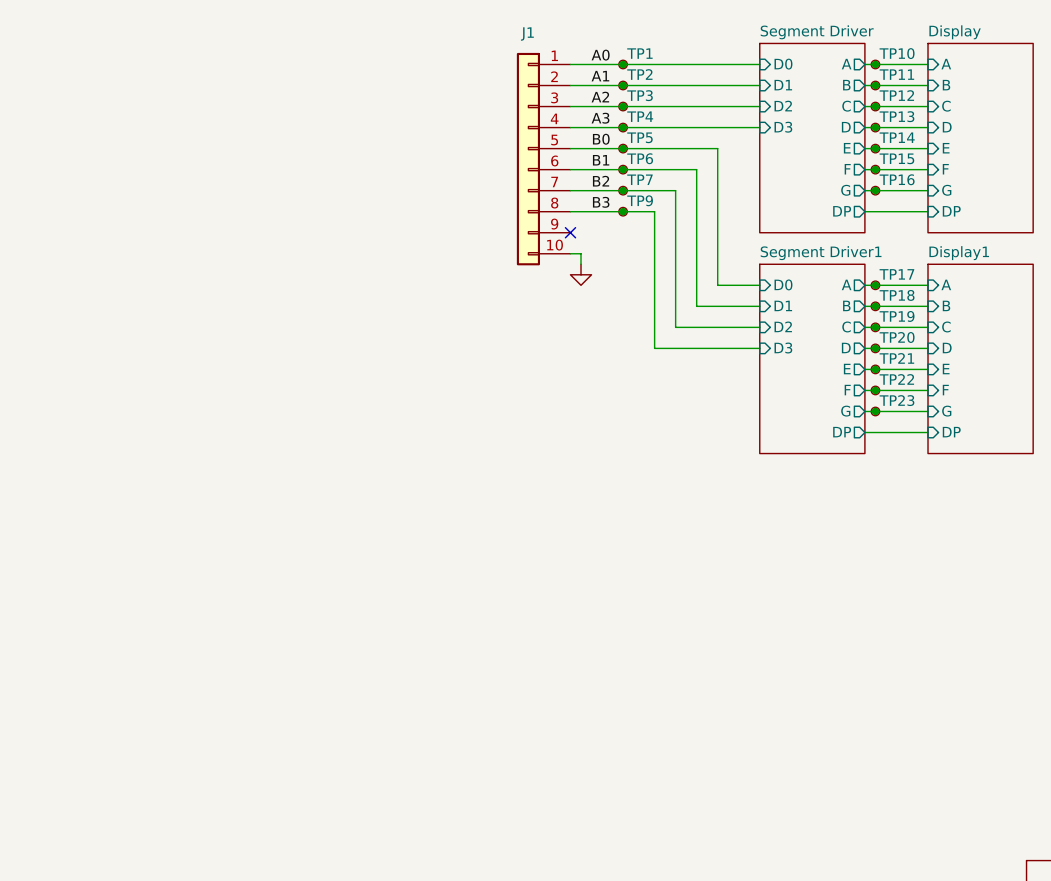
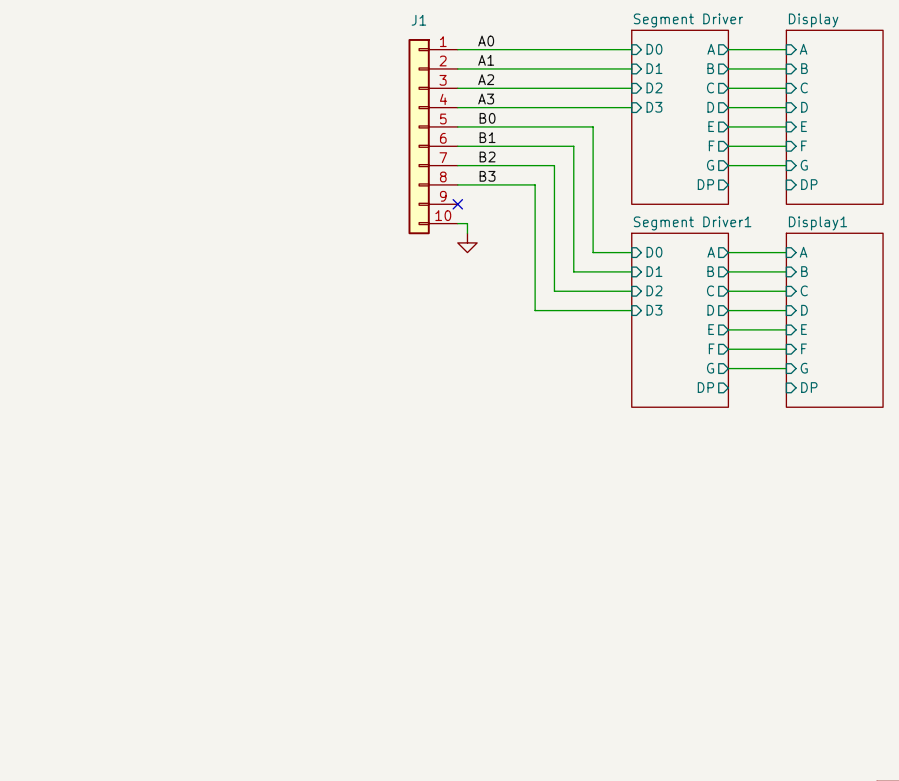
junction: (623, 64) -> none
TP1: (623, 64) -> none
junction: (875, 64) -> none
TP10: (875, 64) -> none
junction: (623, 85) -> none
TP2: (623, 85) -> none
junction: (875, 85) -> none
TP11: (875, 85) -> none
junction: (623, 106) -> none
TP3: (623, 106) -> none
junction: (875, 106) -> none
TP12: (875, 106) -> none
junction: (623, 127) -> none
TP4: (623, 127) -> none
junction: (875, 127) -> none
TP13: (875, 127) -> none
junction: (623, 148) -> none
TP5: (623, 148) -> none
junction: (875, 148) -> none
TP14: (875, 148) -> none
junction: (623, 169) -> none
TP6: (623, 169) -> none
junction: (875, 169) -> none
TP15: (875, 169) -> none
junction: (623, 190) -> none
TP7: (623, 190) -> none
junction: (875, 190) -> none
TP16: (875, 190) -> none
junction: (623, 211) -> none
TP9: (623, 211) -> none
wire: (864, 211) (928, 211) -> none
junction: (875, 285) -> none
TP17: (875, 285) -> none
junction: (875, 306) -> none
TP18: (875, 306) -> none
junction: (875, 327) -> none
TP19: (875, 327) -> none
junction: (875, 348) -> none
TP20: (875, 348) -> none
junction: (875, 369) -> none
TP21: (875, 369) -> none
junction: (875, 390) -> none
TP22: (875, 390) -> none
junction: (875, 411) -> none
TP23: (875, 411) -> none
wire: (864, 432) (928, 432) -> none

